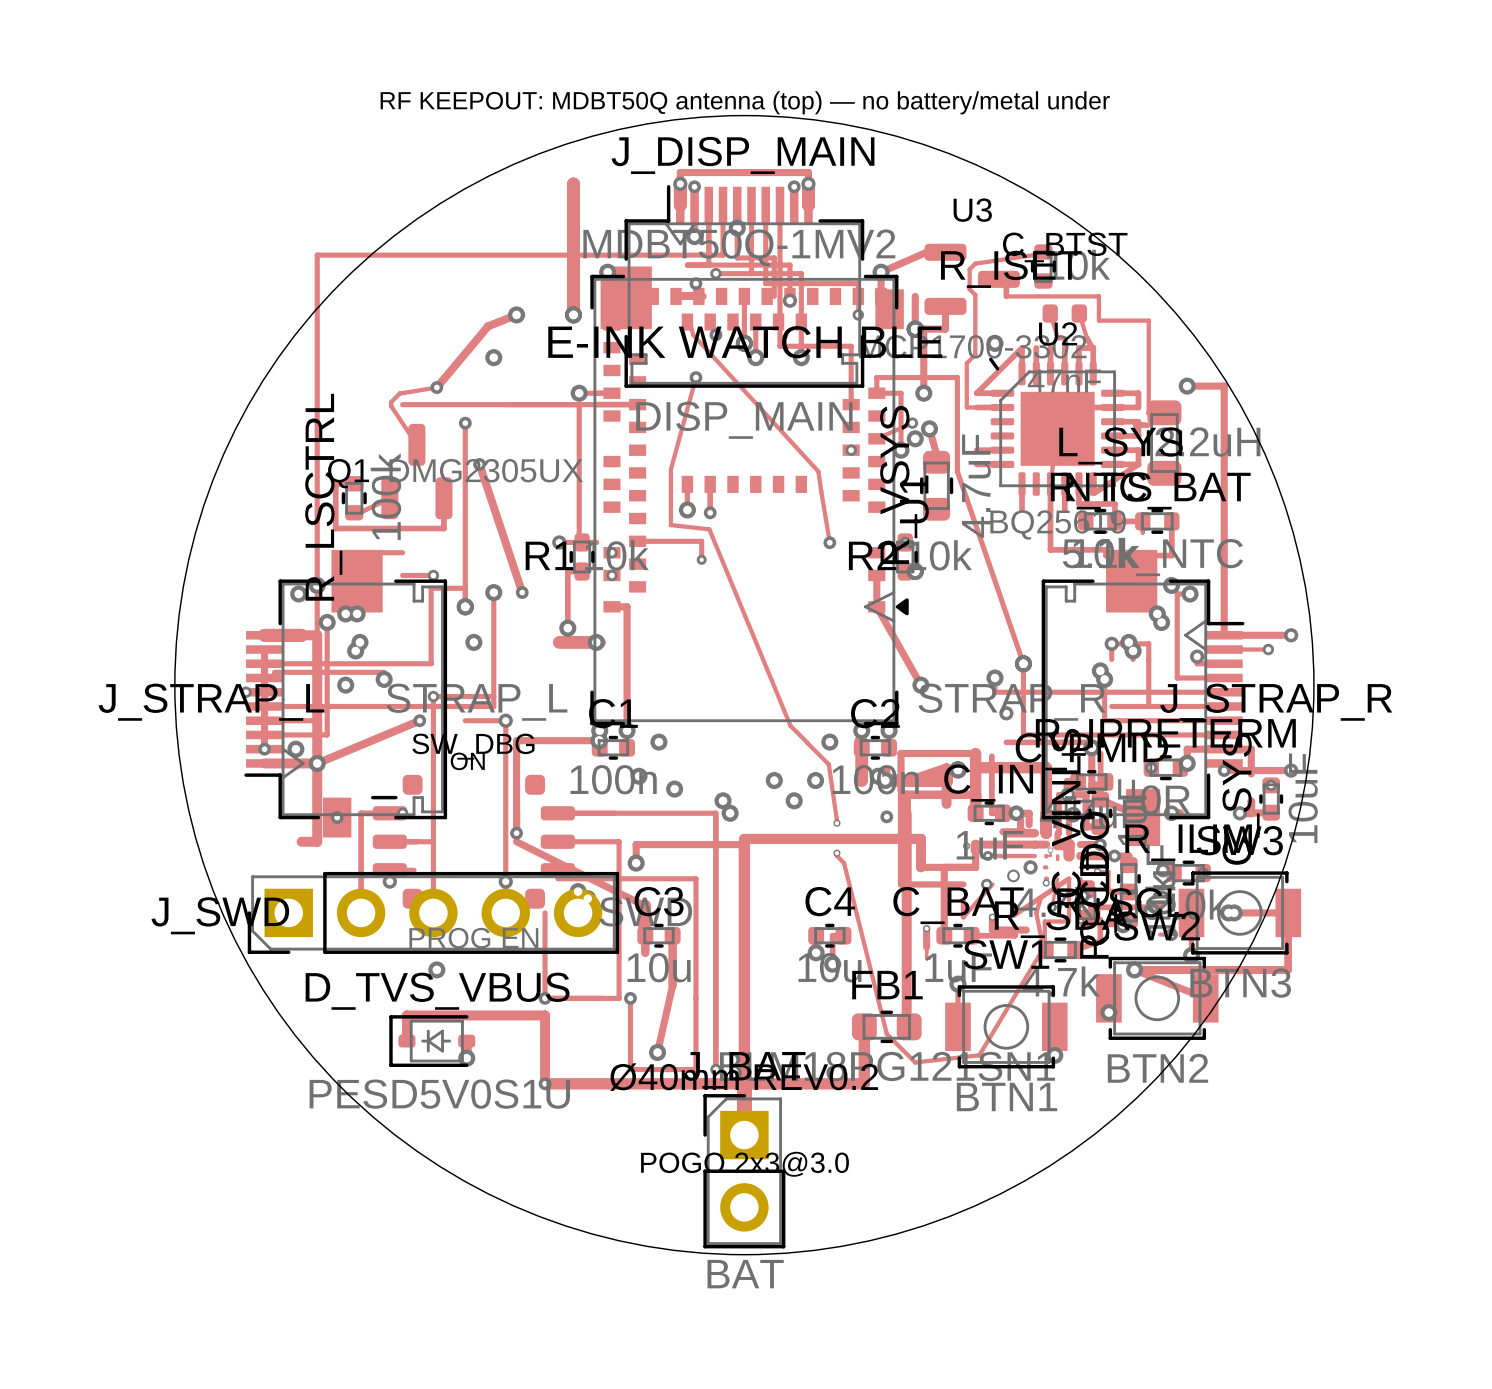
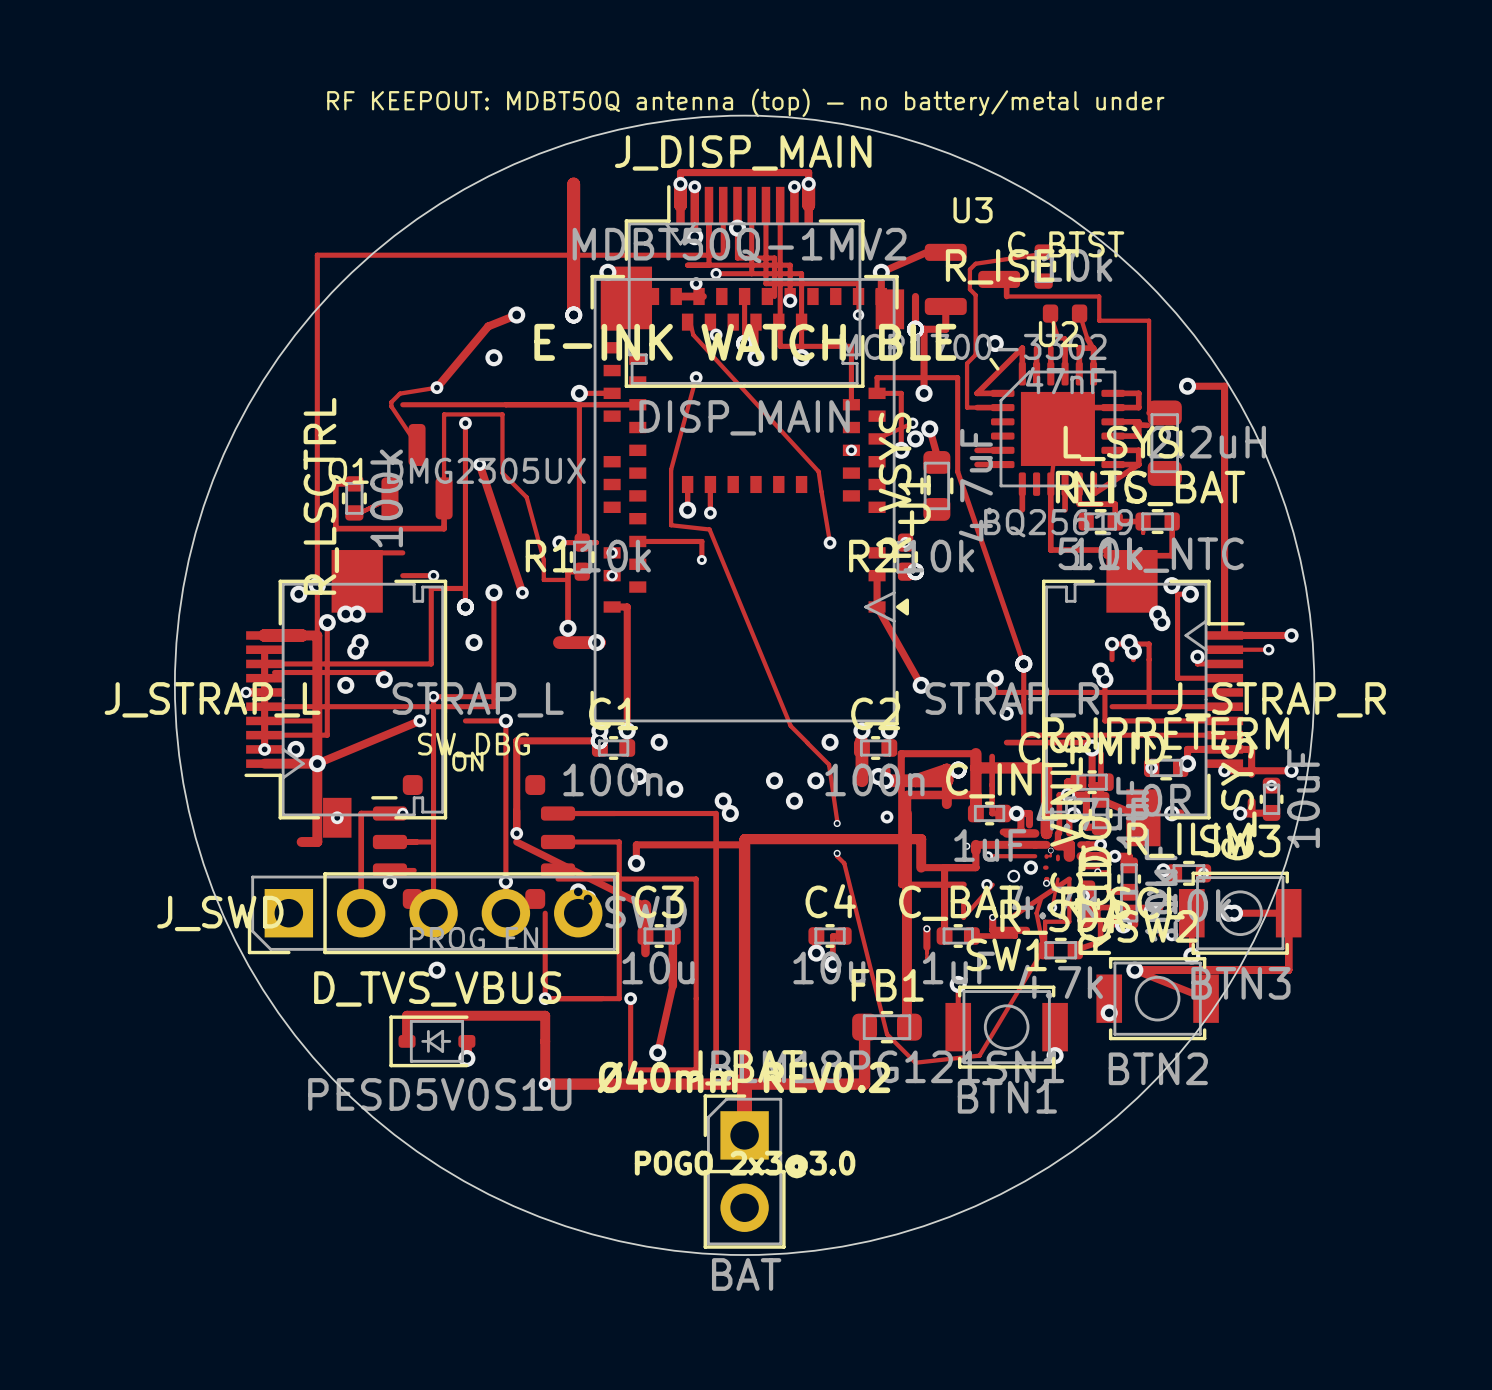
track: none -> (444, 508) (444, 414) (502, 414) (502, 473) (526, 497) (543, 559) (543, 579) (567, 579)

